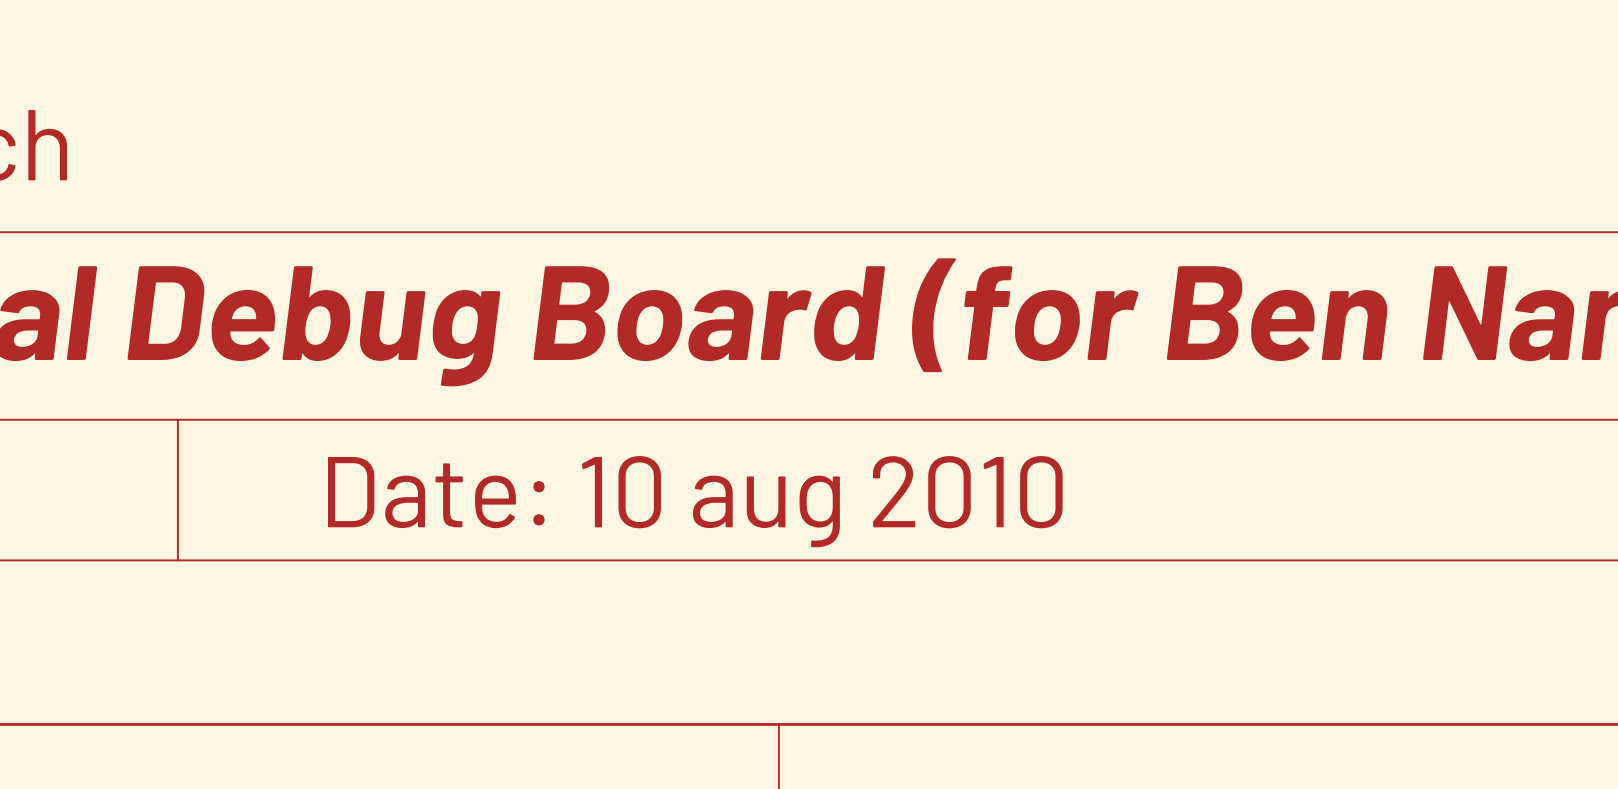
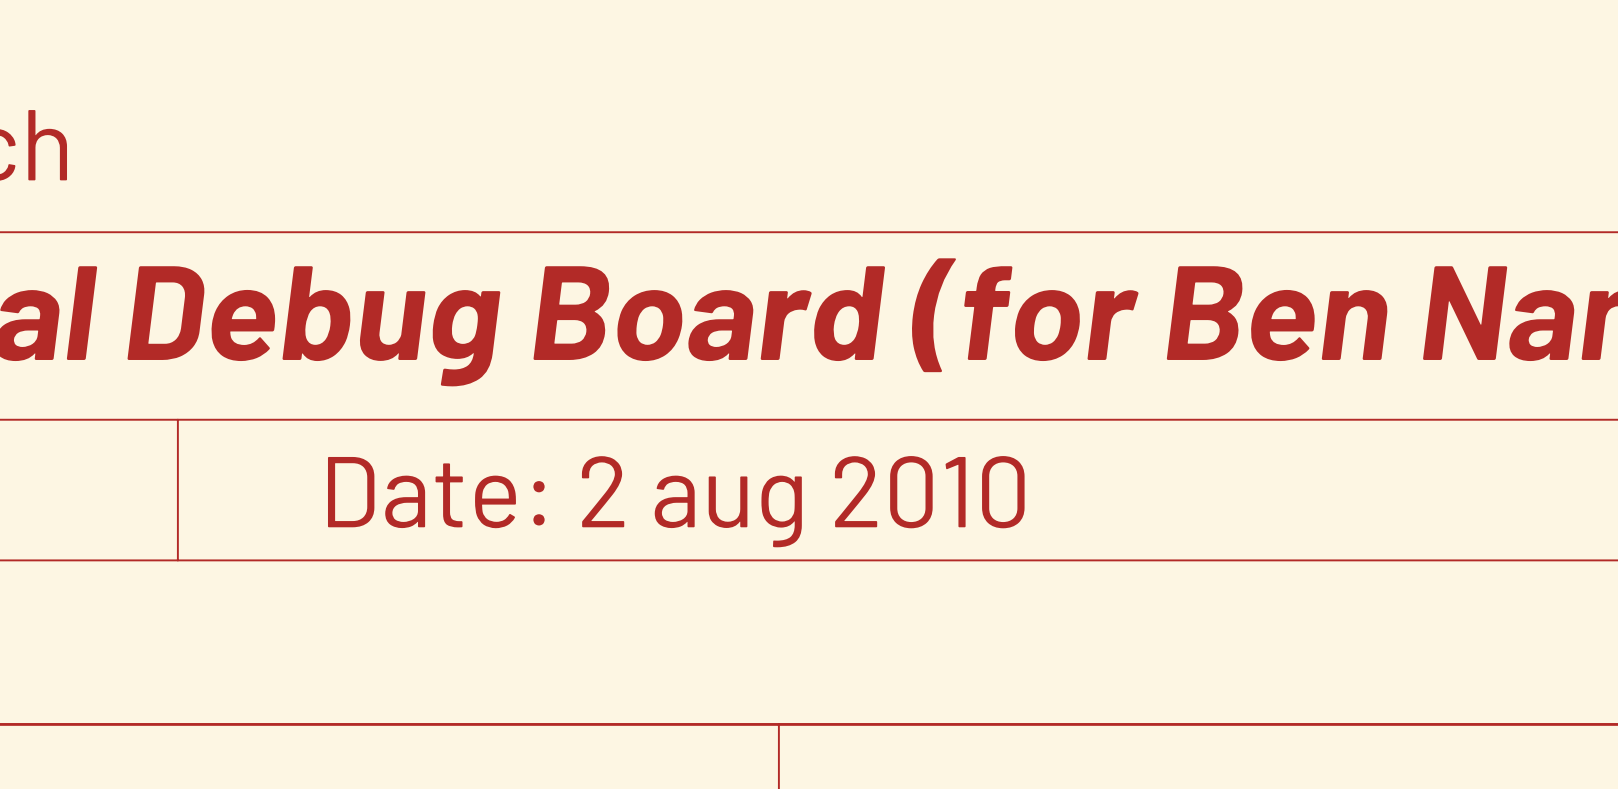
title block: Date: 10 aug 2010 (695, 501) -> Date: 2 aug 2010 (676, 501)

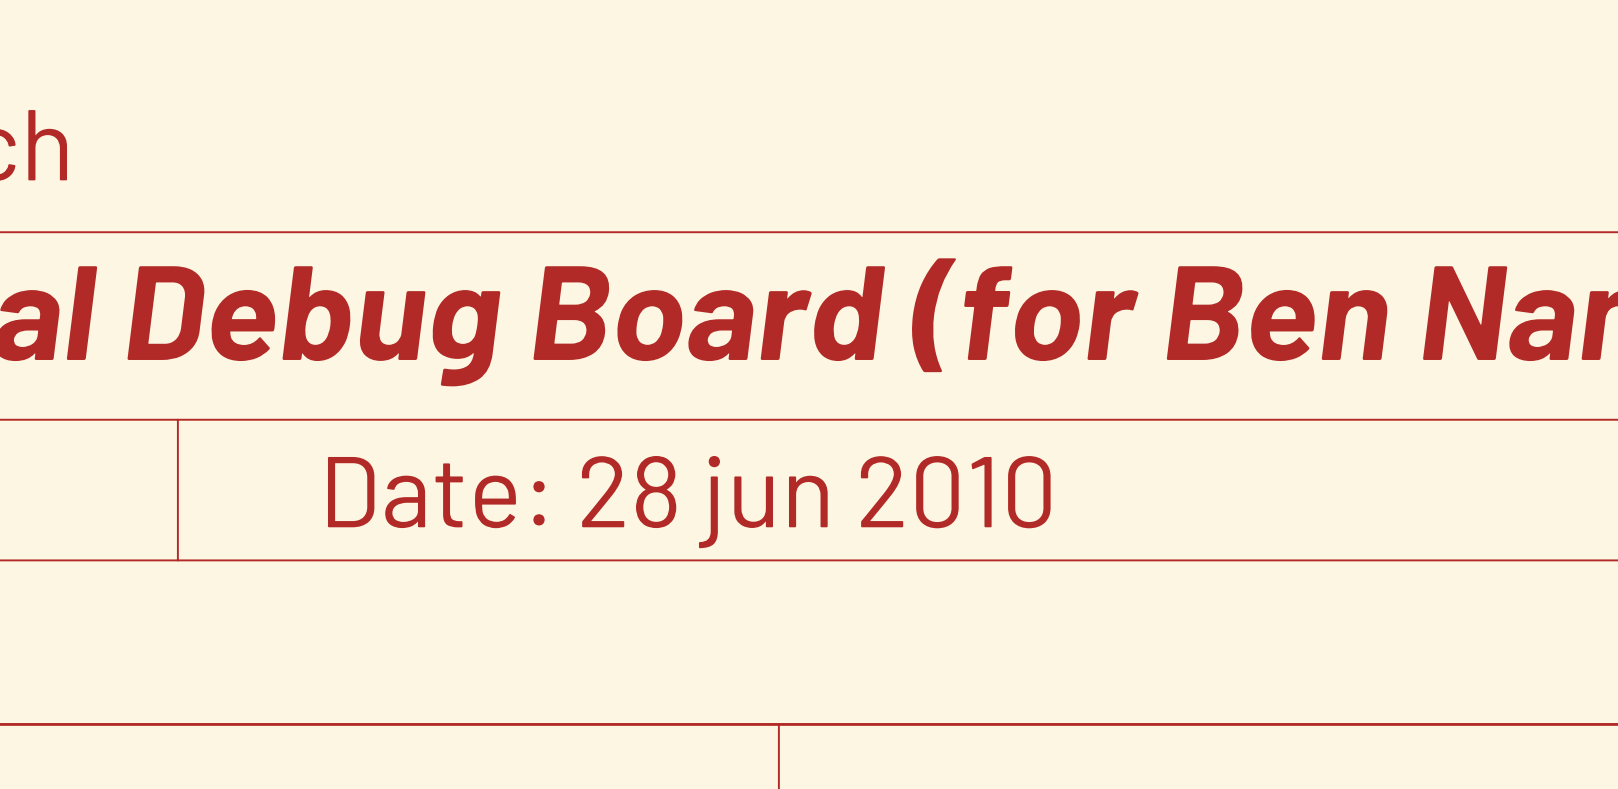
title block: Date: 2 aug 2010 (676, 501) -> Date: 28 jun 2010 (689, 502)

